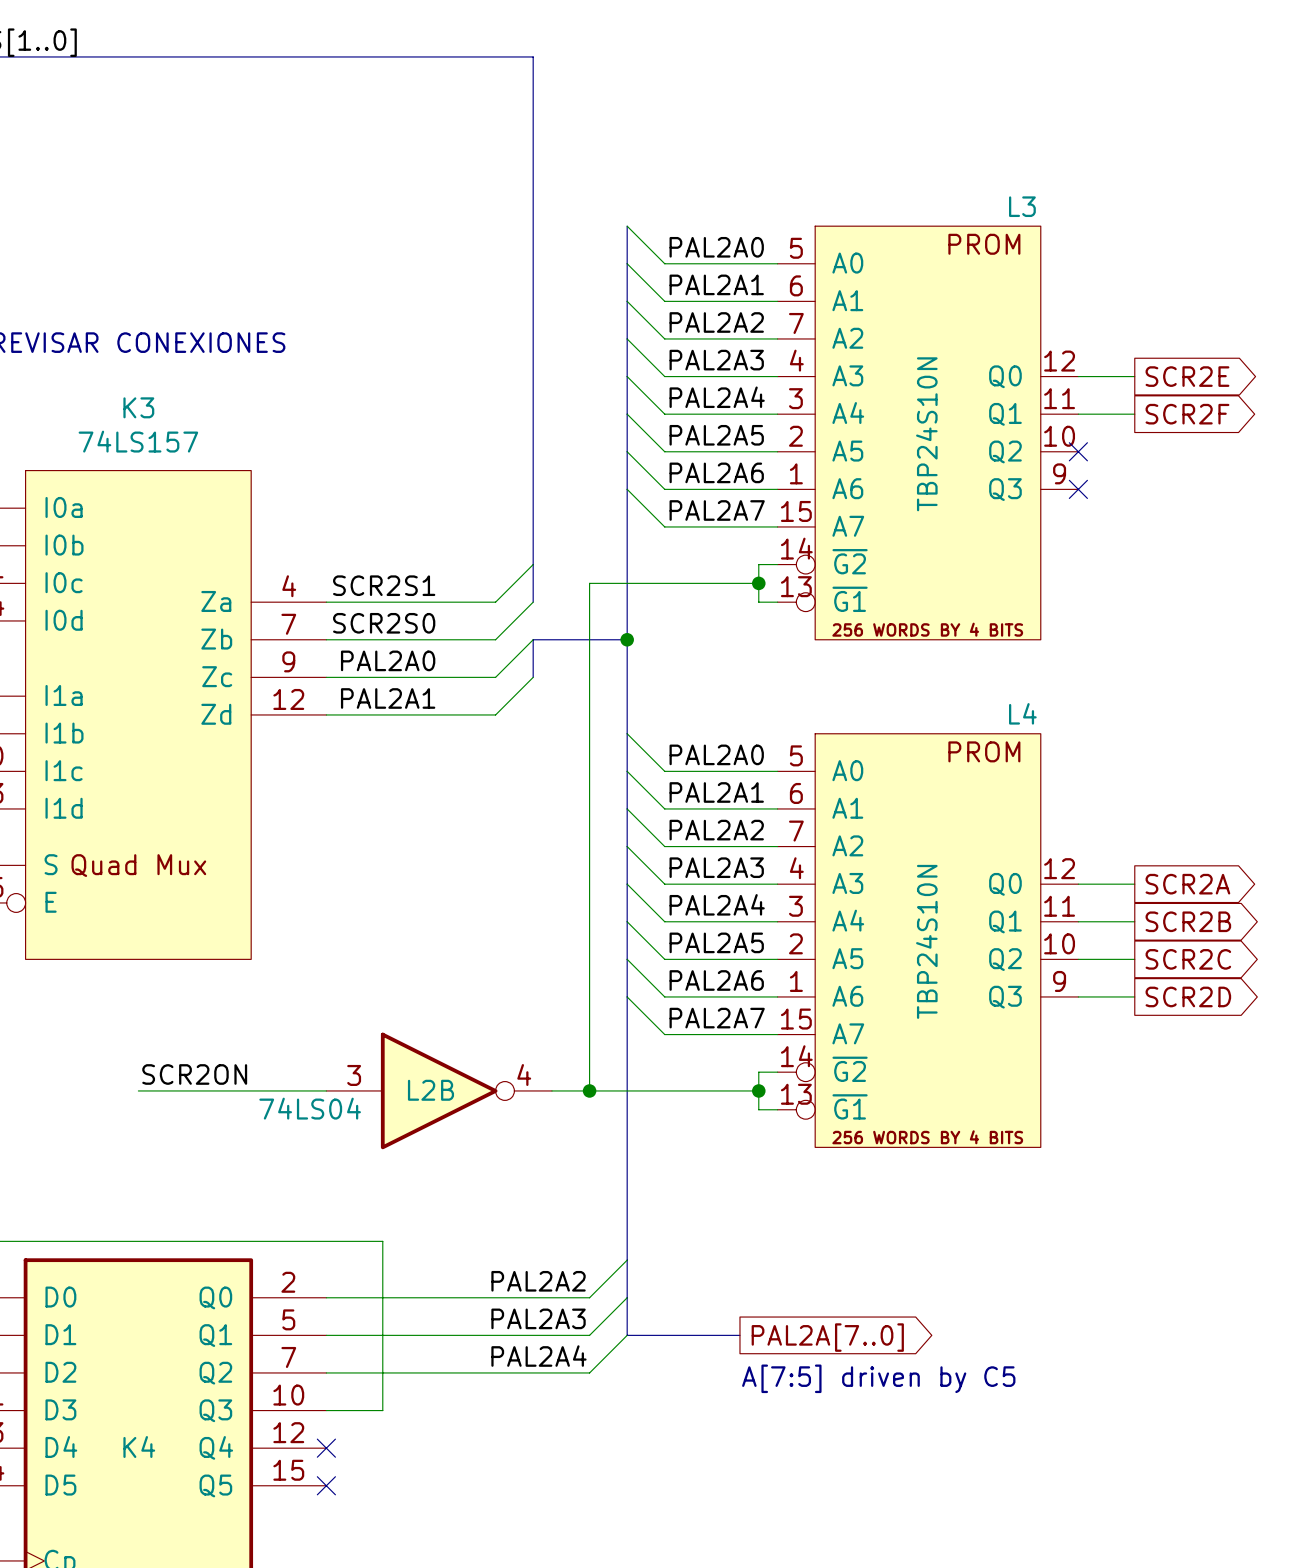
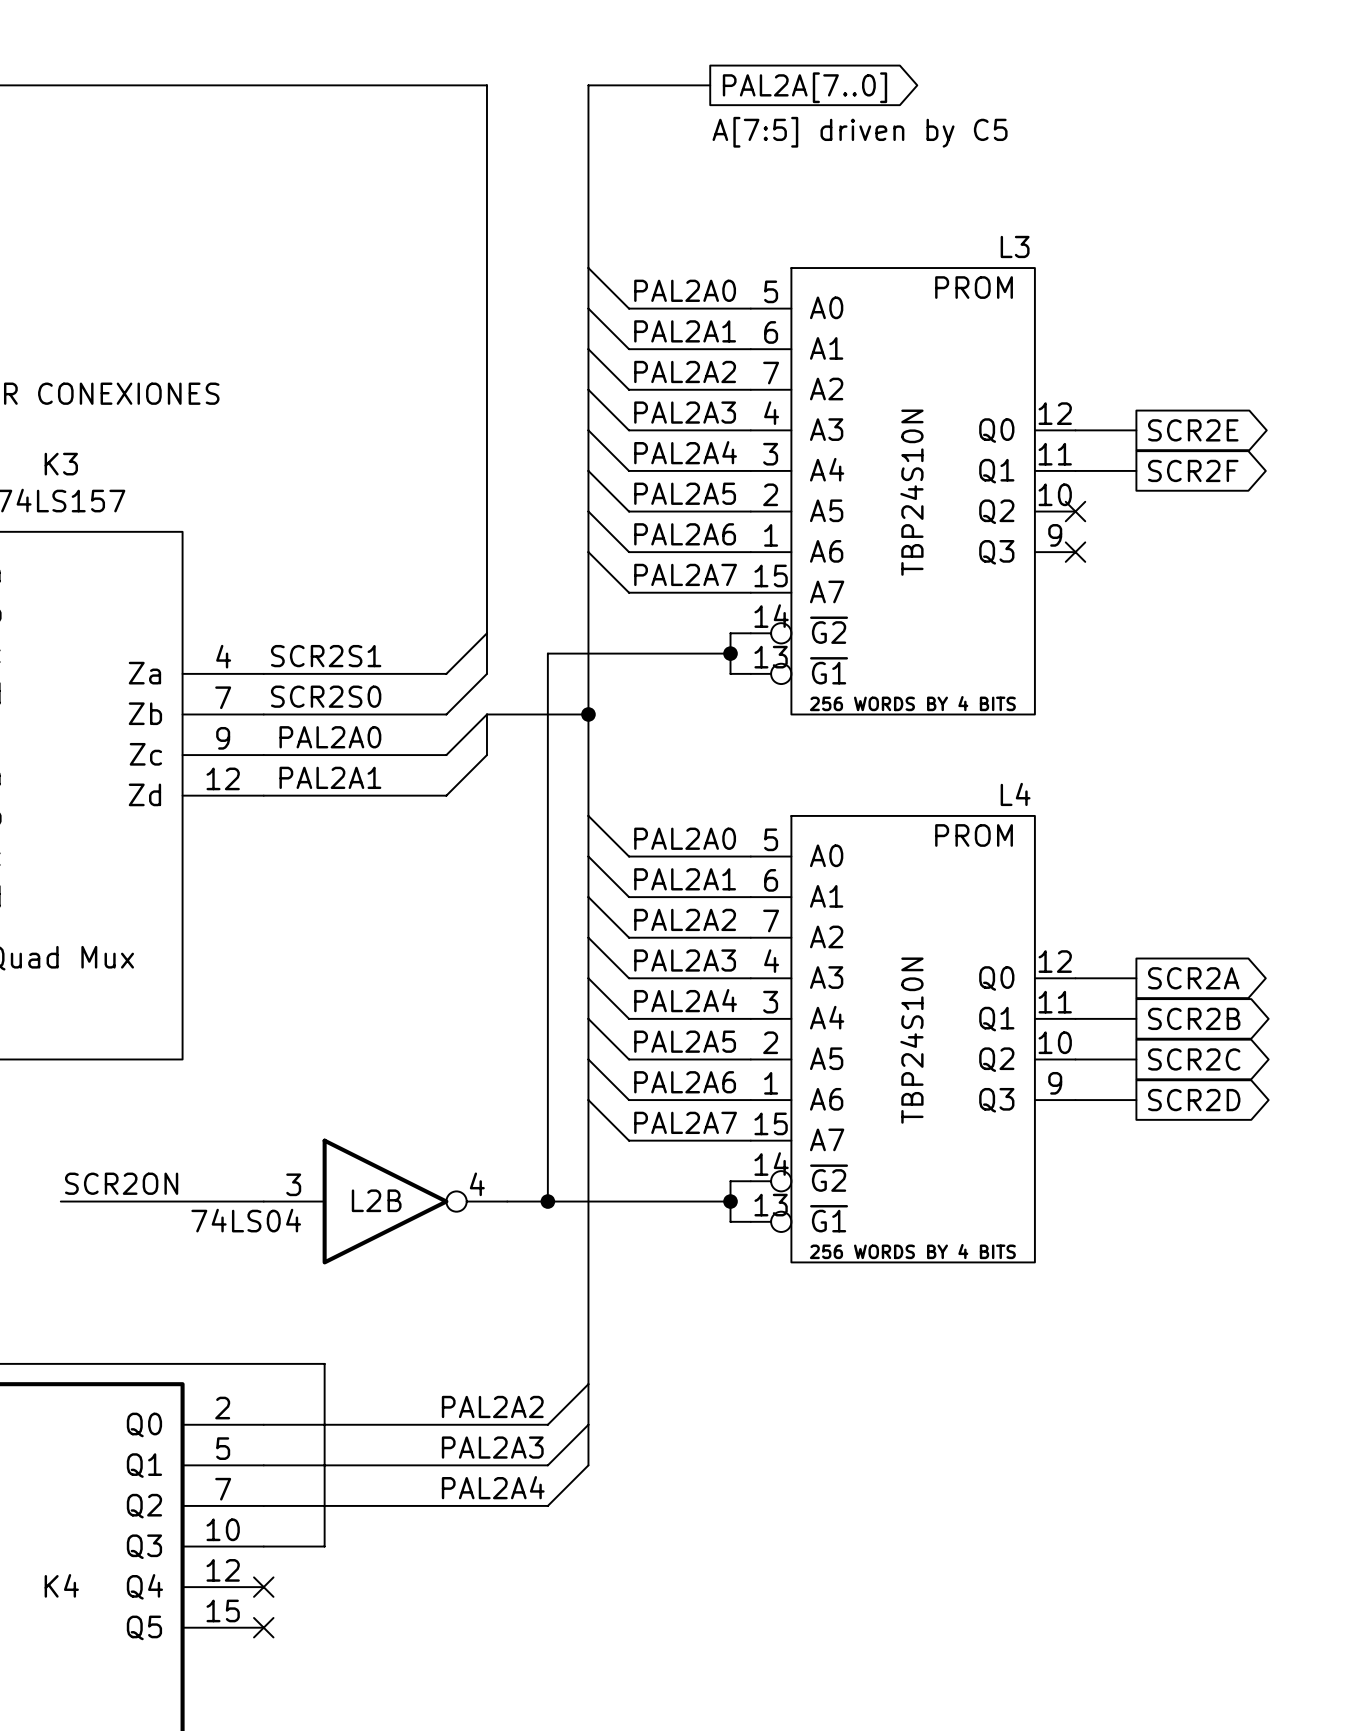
bus: none -> (710, 85) (588, 85) (588, 268)
global label: none -> PAL2A[7..0] (804, 87)
text: none -> A[7:5] driven by C5 (860, 132)
bus: (627, 1335) (739, 1335) -> none
global label: PAL2A[7..0] (827, 1337) -> none
text: A[7:5] driven by C5 (878, 1378) -> none

